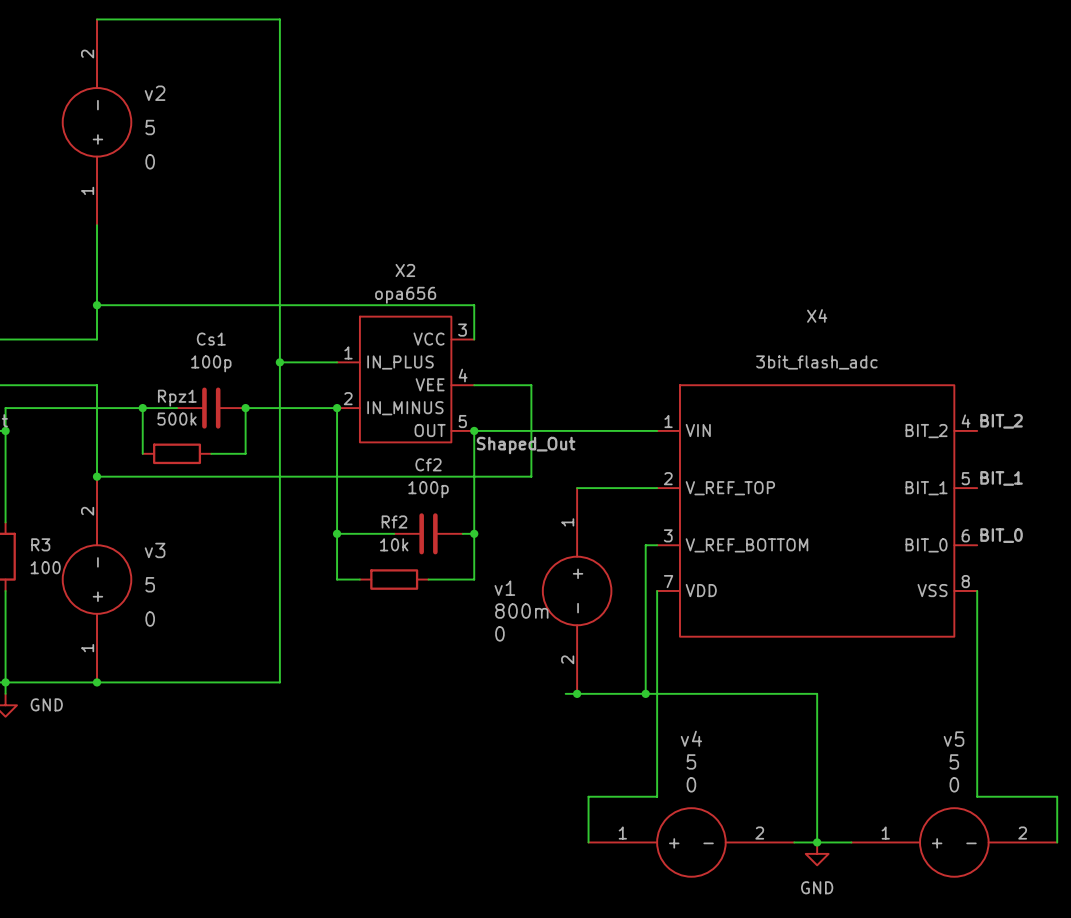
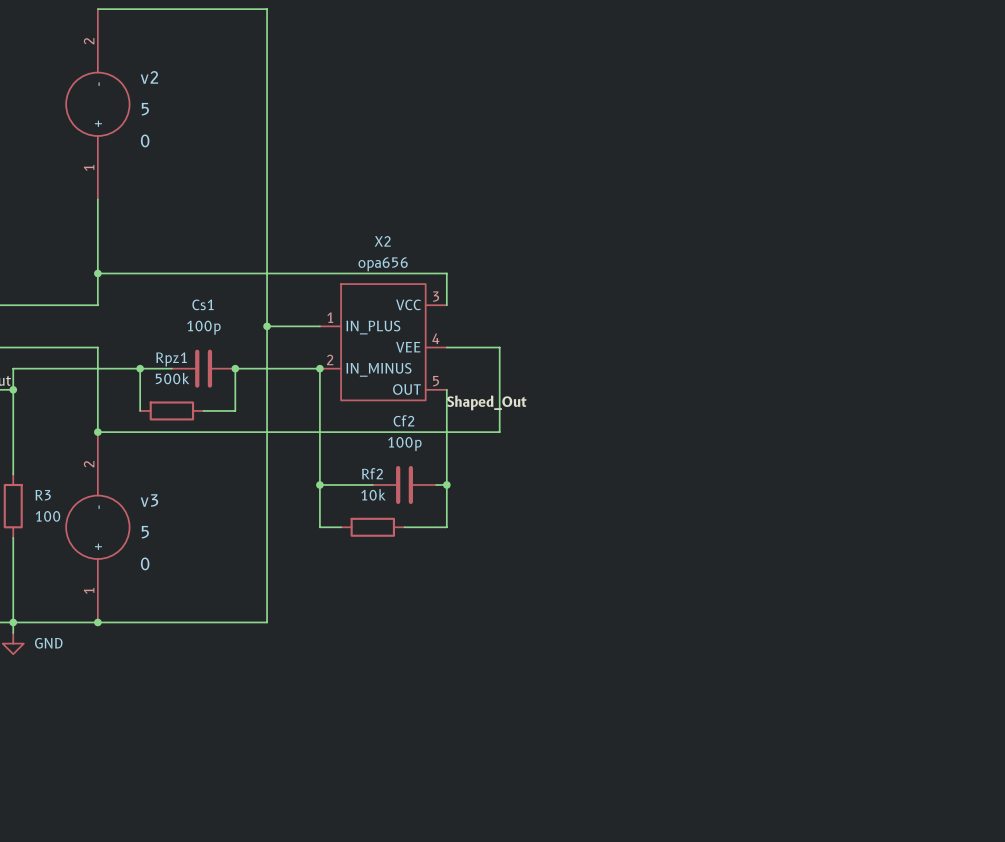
label: BIT_2 (1001, 421) -> none
wire: (474, 430) (657, 430) -> none
junction: (474, 430) -> none
label: BIT_1 (1001, 478) -> none
wire: (577, 488) (657, 488) -> none
X4: (817, 510) -> none
label: BIT_0 (1001, 535) -> none
wire: (657, 545) (645, 545) (645, 693) -> none
v1: 800m (577, 590) -> none
wire: (657, 590) (657, 796) (588, 796) (588, 842) -> none
wire: (977, 590) (977, 796) (1057, 796) (1057, 842) -> none
wire: (565, 693) (817, 693) (817, 842) -> none
junction: (577, 693) -> none
junction: (645, 693) -> none
v4: 5 (691, 842) -> none
wire: (794, 842) (851, 842) -> none
junction: (817, 842) -> none
v5: 5 (954, 842) -> none
power symbol: GND (817, 853) -> none

